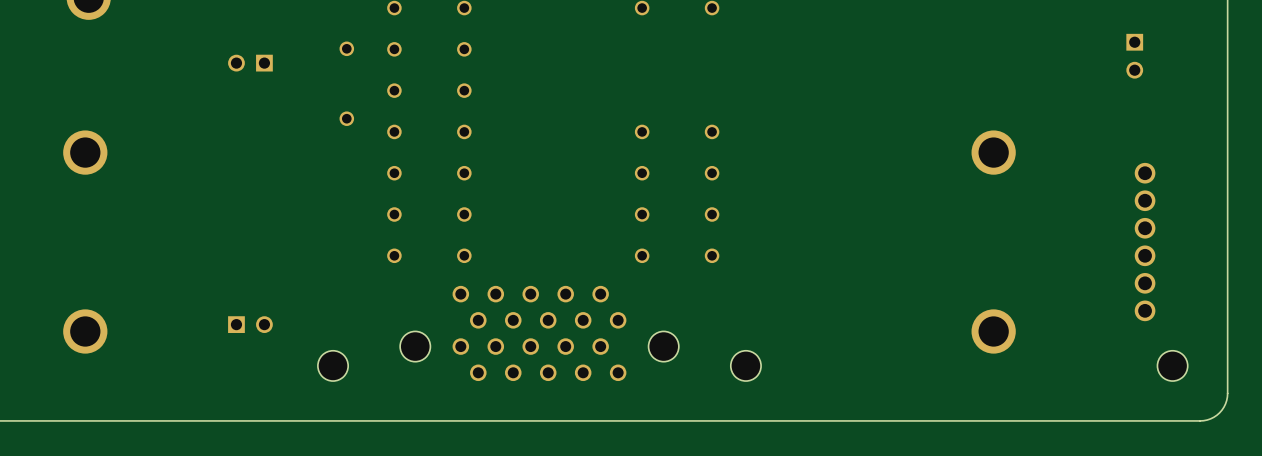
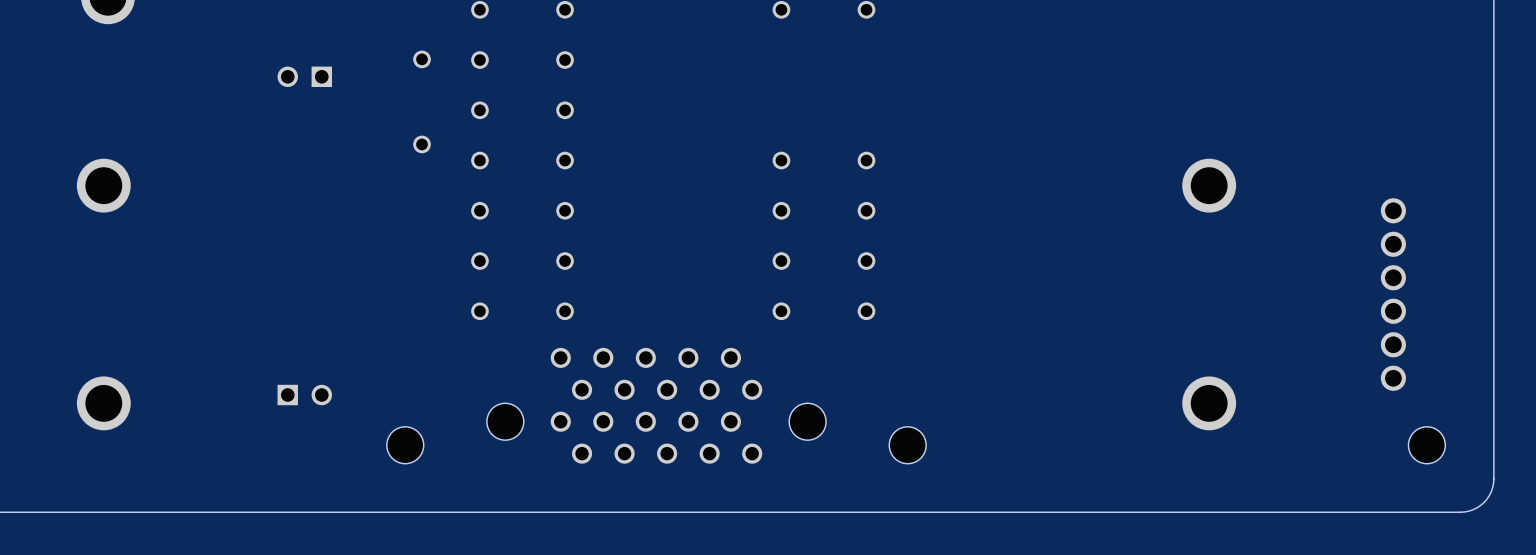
part: (1134, 56) -> none

